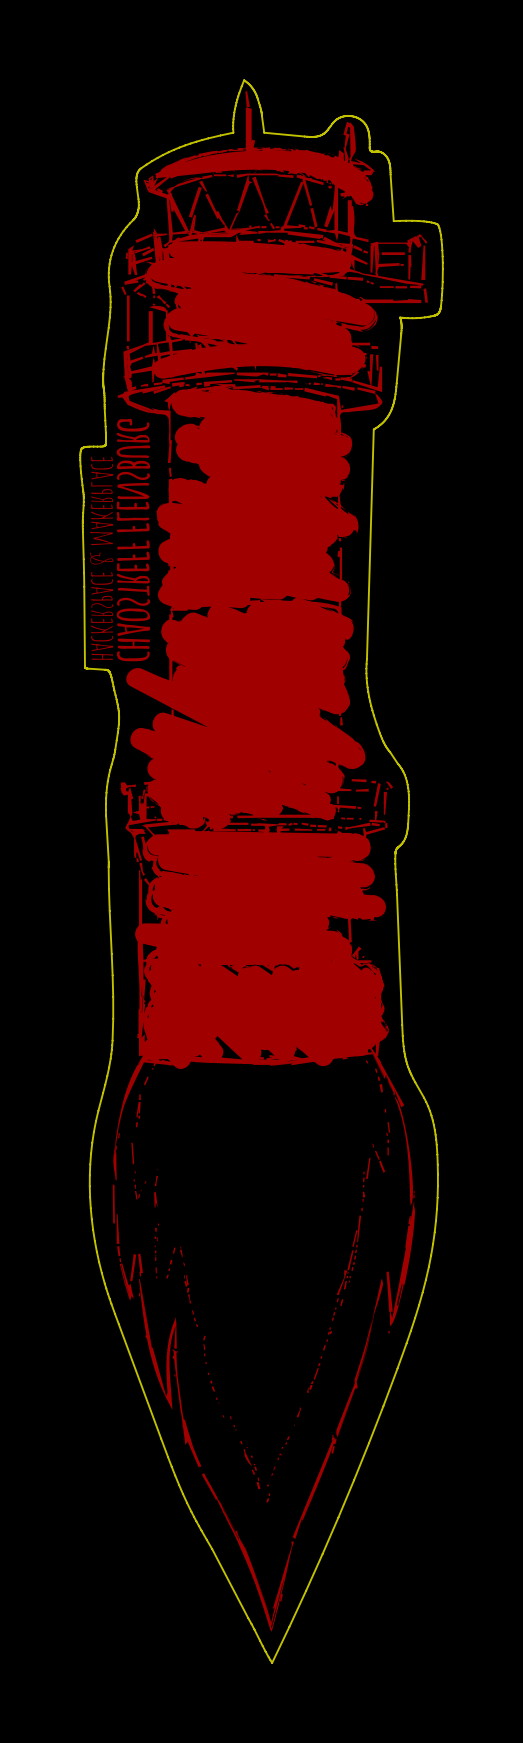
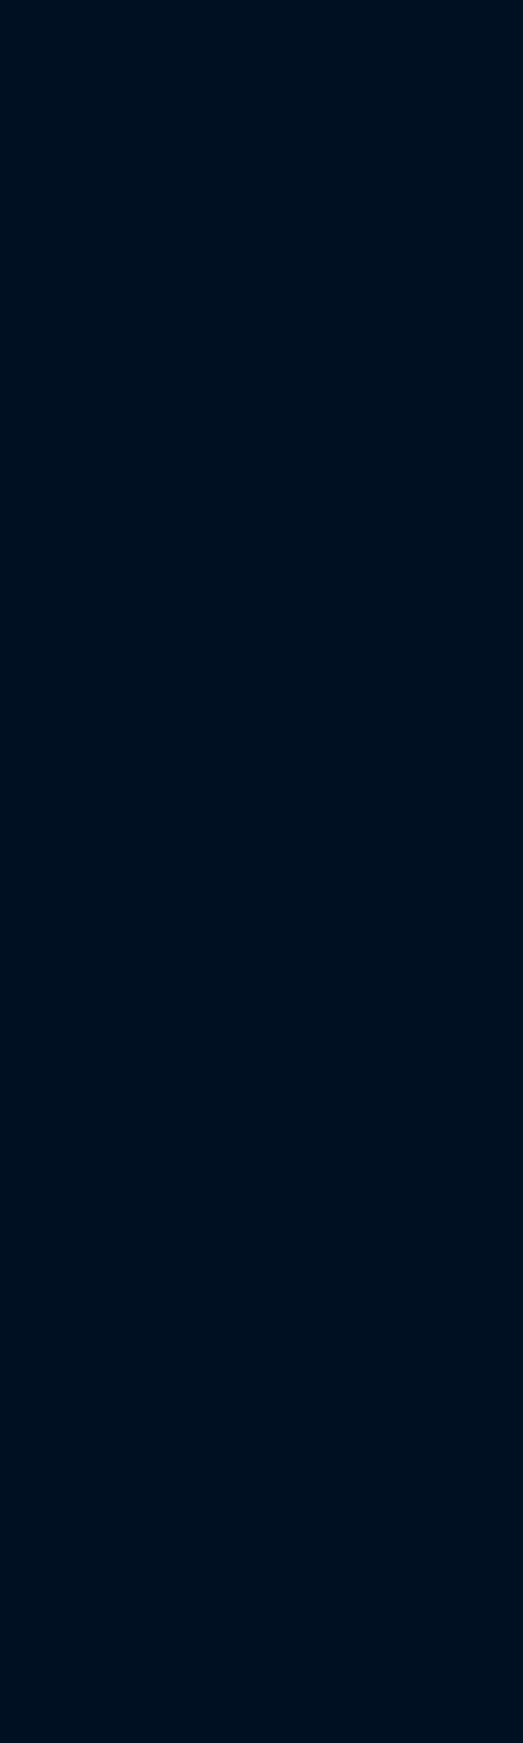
drawing: [90, 91, 428, 1632] -> none
board edge: (369, 148) (366, 125) (360, 119) (351, 116) (338, 118) (325, 132) (316, 136) (264, 132) (256, 96) (251, 87) (244, 80) (234, 109) (233, 132) (179, 147) (157, 157) (139, 169) (136, 178) (138, 202) (137, 212) (118, 238) (109, 263) (110, 312) (103, 376) (105, 443) -> none
board edge: (372, 151) (382, 153) (389, 162) (393, 221) (418, 220) (437, 224) (440, 235) (442, 256) (439, 310) (436, 314) (428, 316) (400, 317) (401, 330) (394, 401) (386, 418) (373, 429) (366, 678) (371, 706) (380, 735) (402, 770) (407, 784) (409, 801) (407, 831) (403, 840) (396, 849) -> none
board edge: (105, 445) (84, 447) (80, 452) (83, 498) (84, 665) -> none
board edge: (87, 668) (106, 669) -> none
board edge: (109, 672) (119, 716) (114, 752) (107, 781) (105, 804) (113, 1018) (110, 1058) (95, 1121) (91, 1153) (90, 1197) (94, 1241) (109, 1298) (179, 1484) (193, 1516) (272, 1662) (322, 1554) (383, 1406) (418, 1305) (433, 1243) (437, 1197) (436, 1144) (429, 1111) (409, 1070) (404, 1051) (395, 852) -> none

